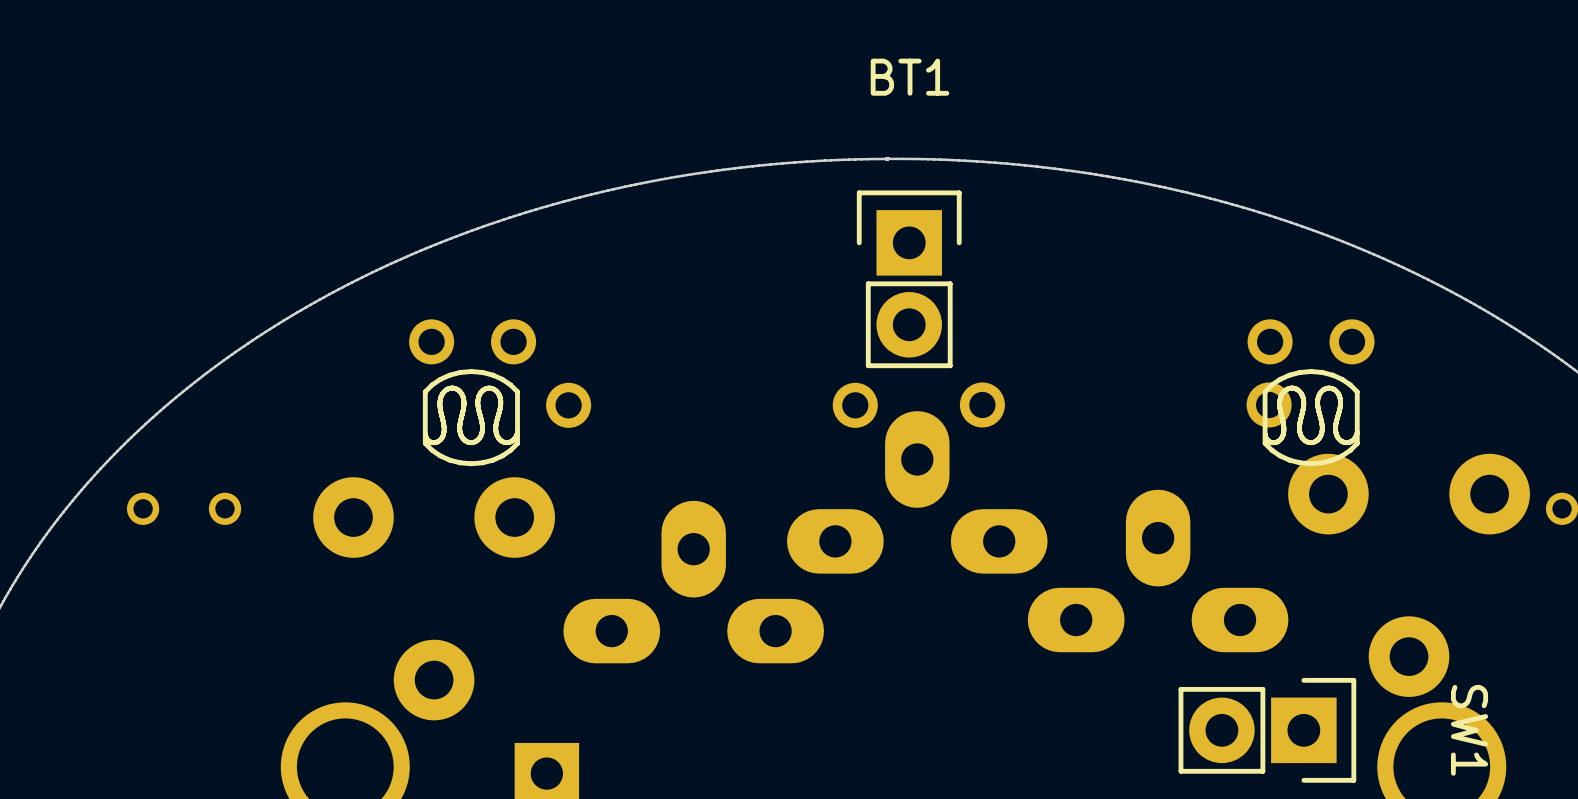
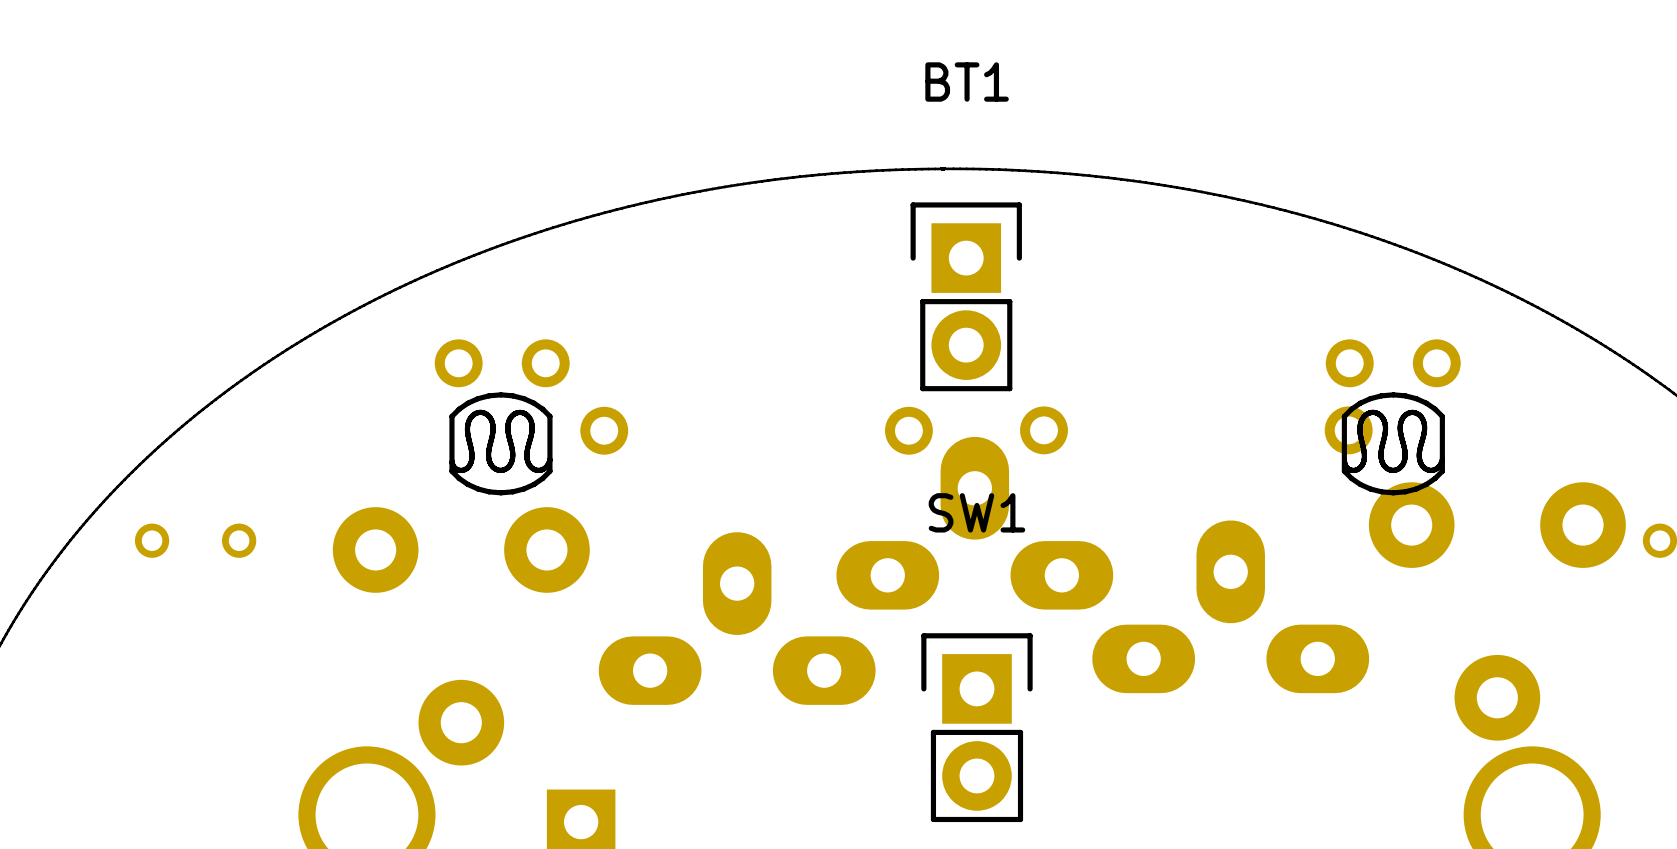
SW1 rotation: 0° (1267, 730) -> 90° counterclockwise (976, 727)
SW1 position: (1267, 730) -> (976, 727)

